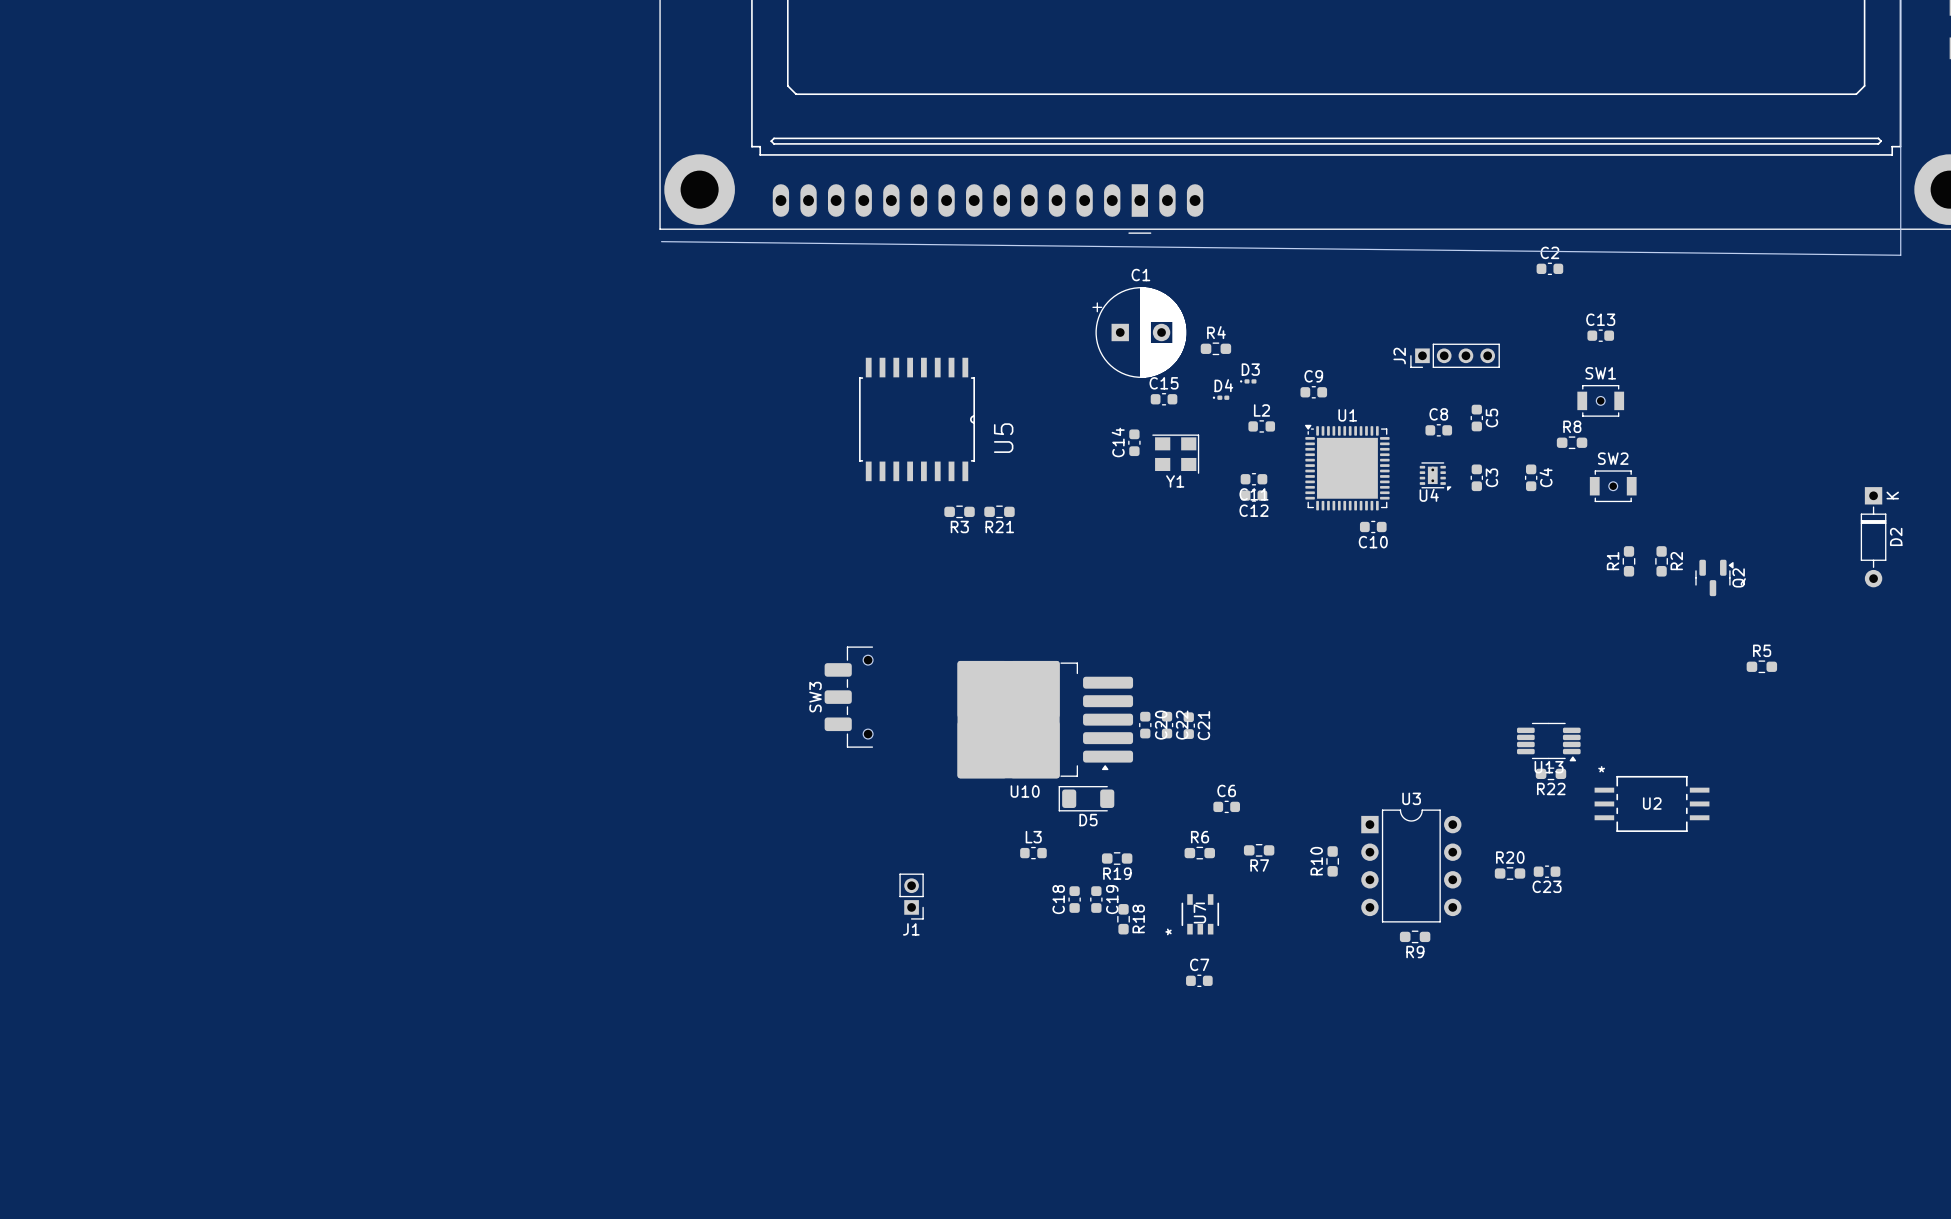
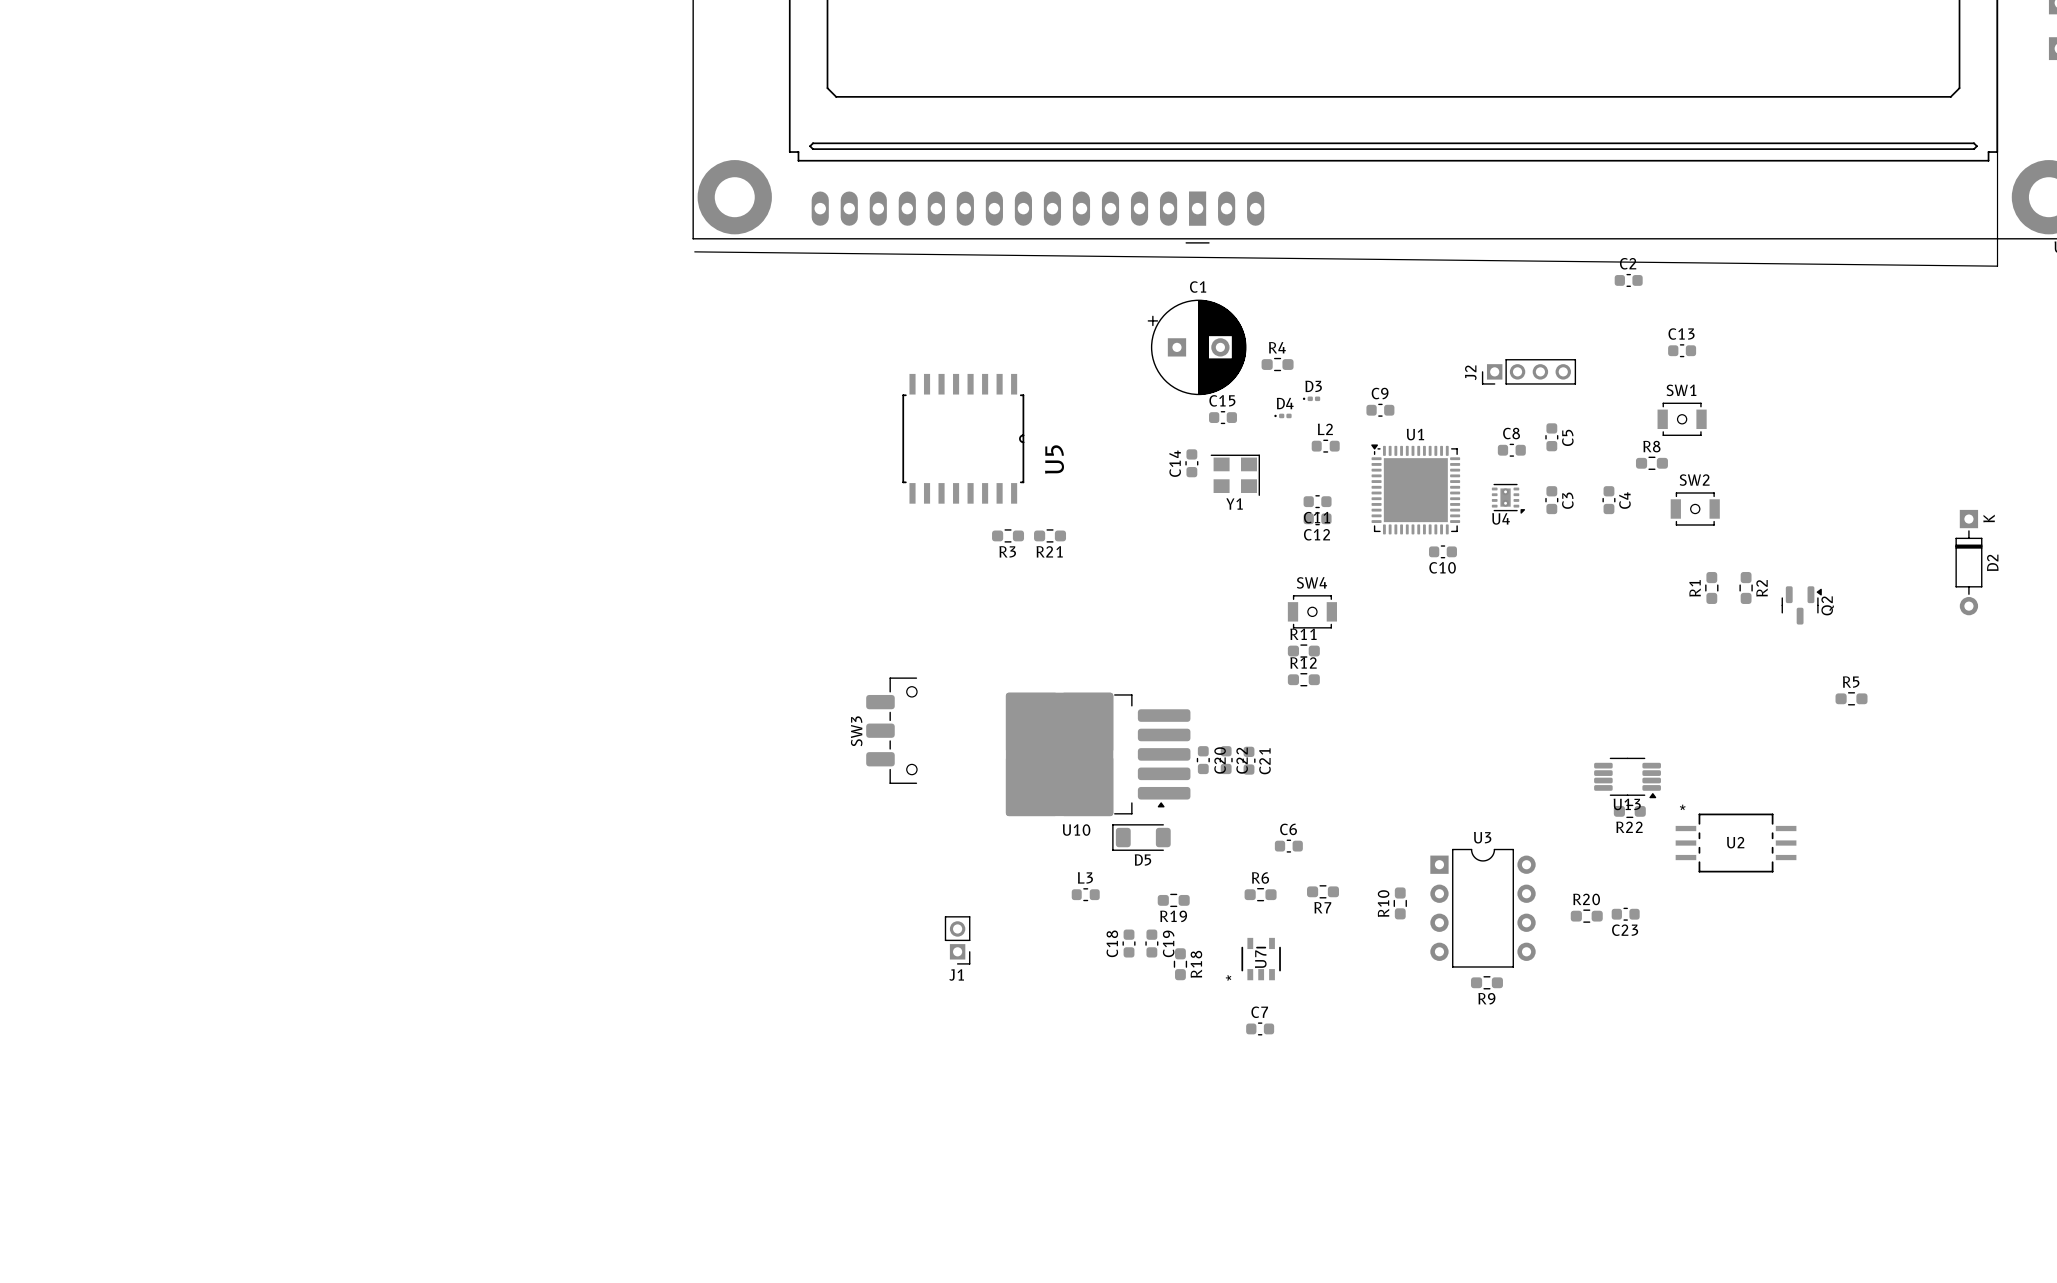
SW4: none -> (1312, 611)
R11: none -> (1303, 651)
R12: none -> (1303, 679)

